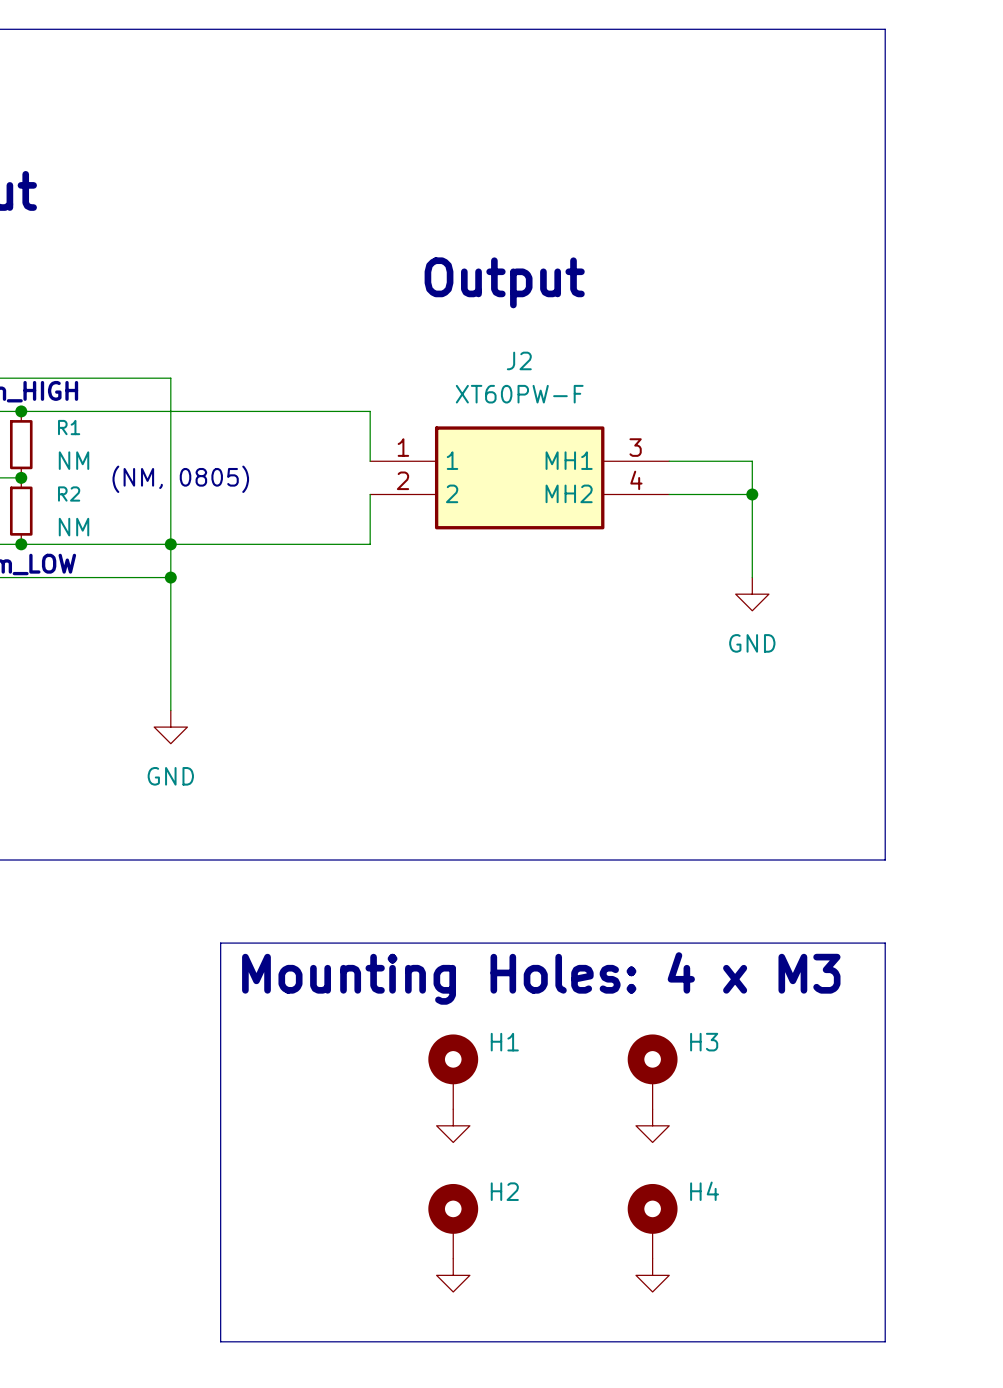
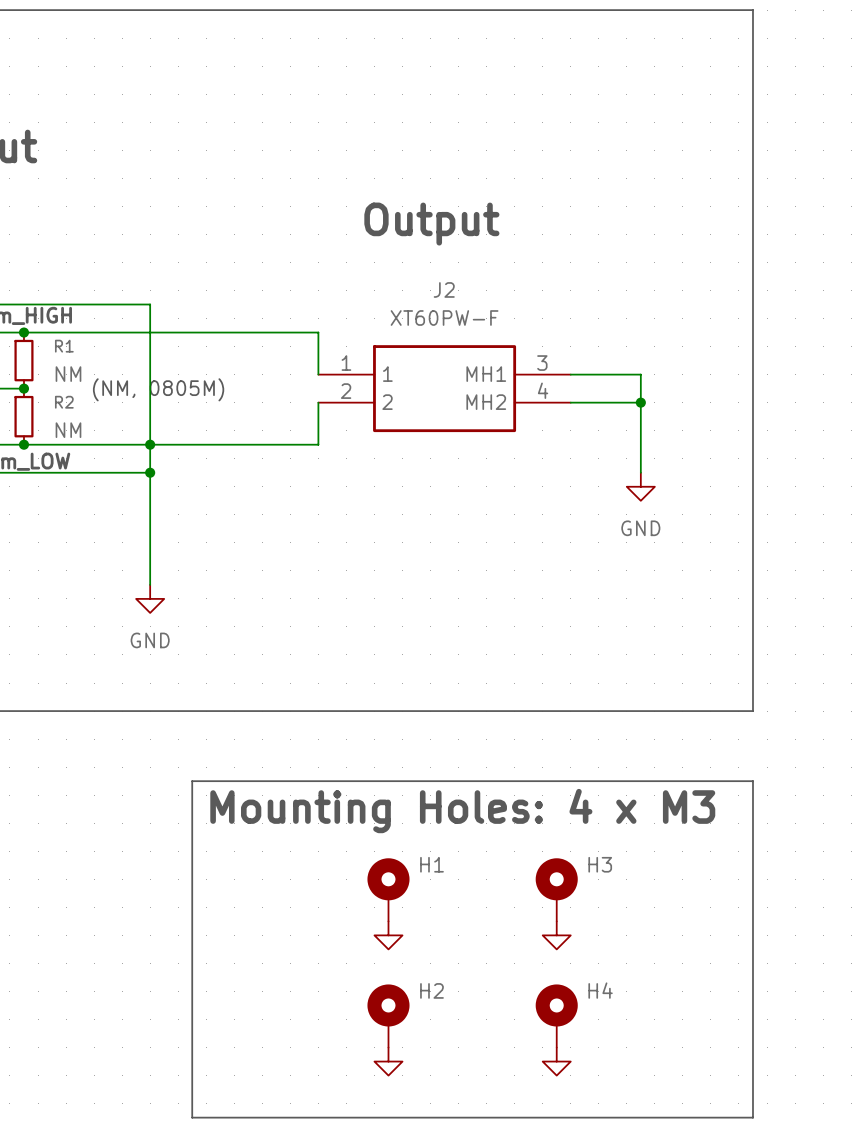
text: (NM, 0805) (180, 479) -> (NM, 0805M) (158, 389)

